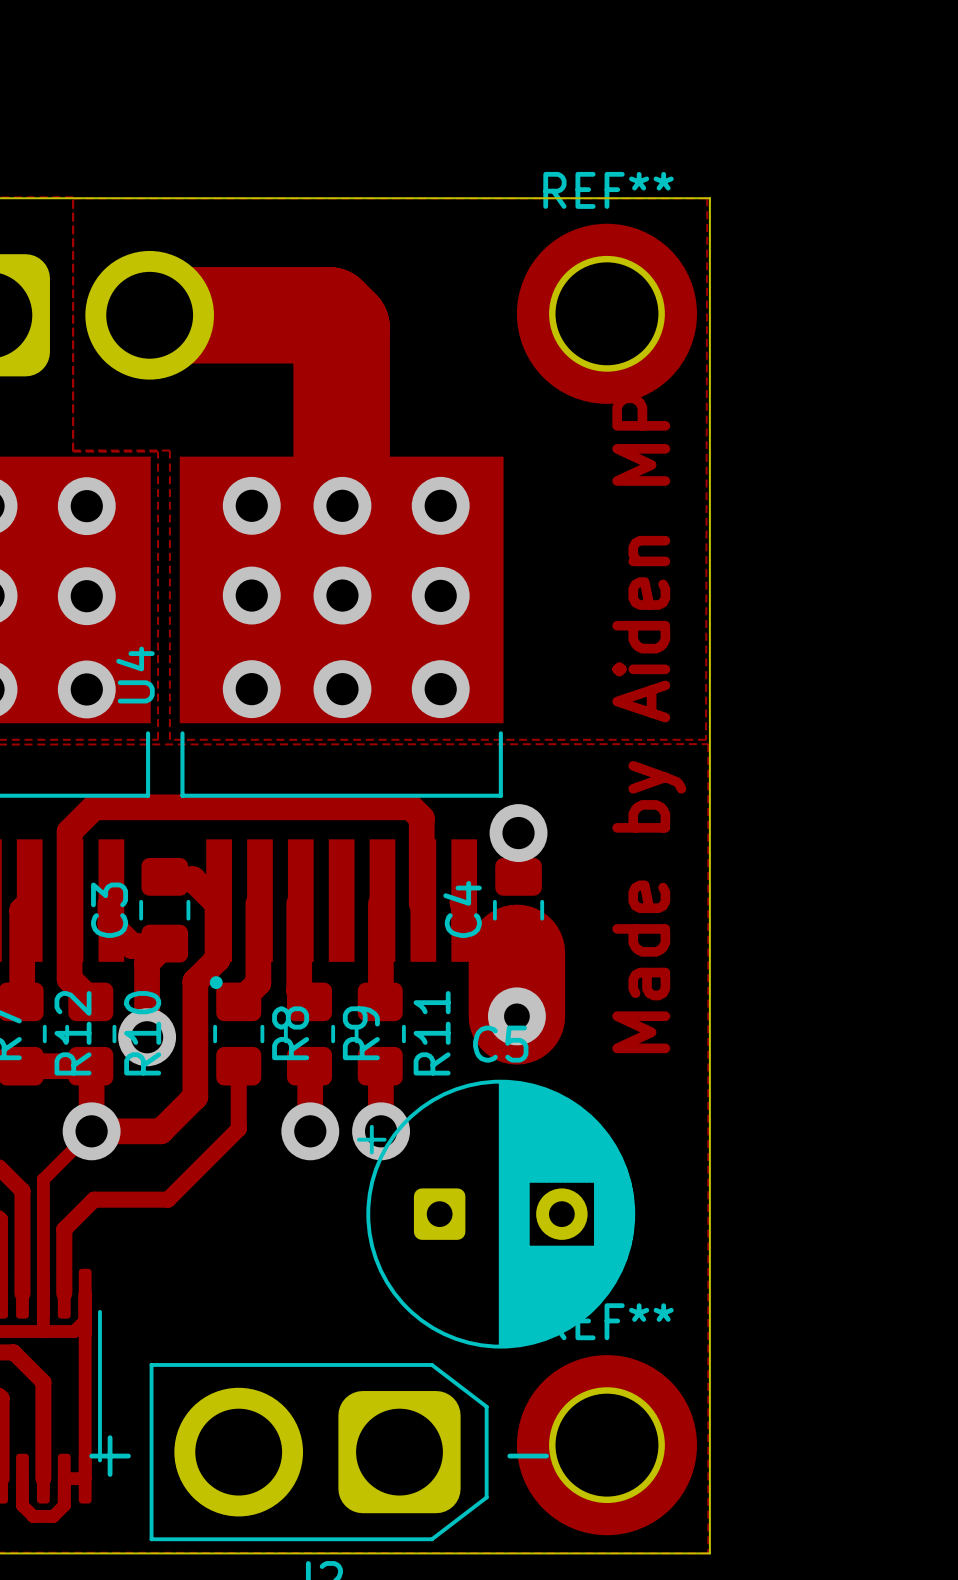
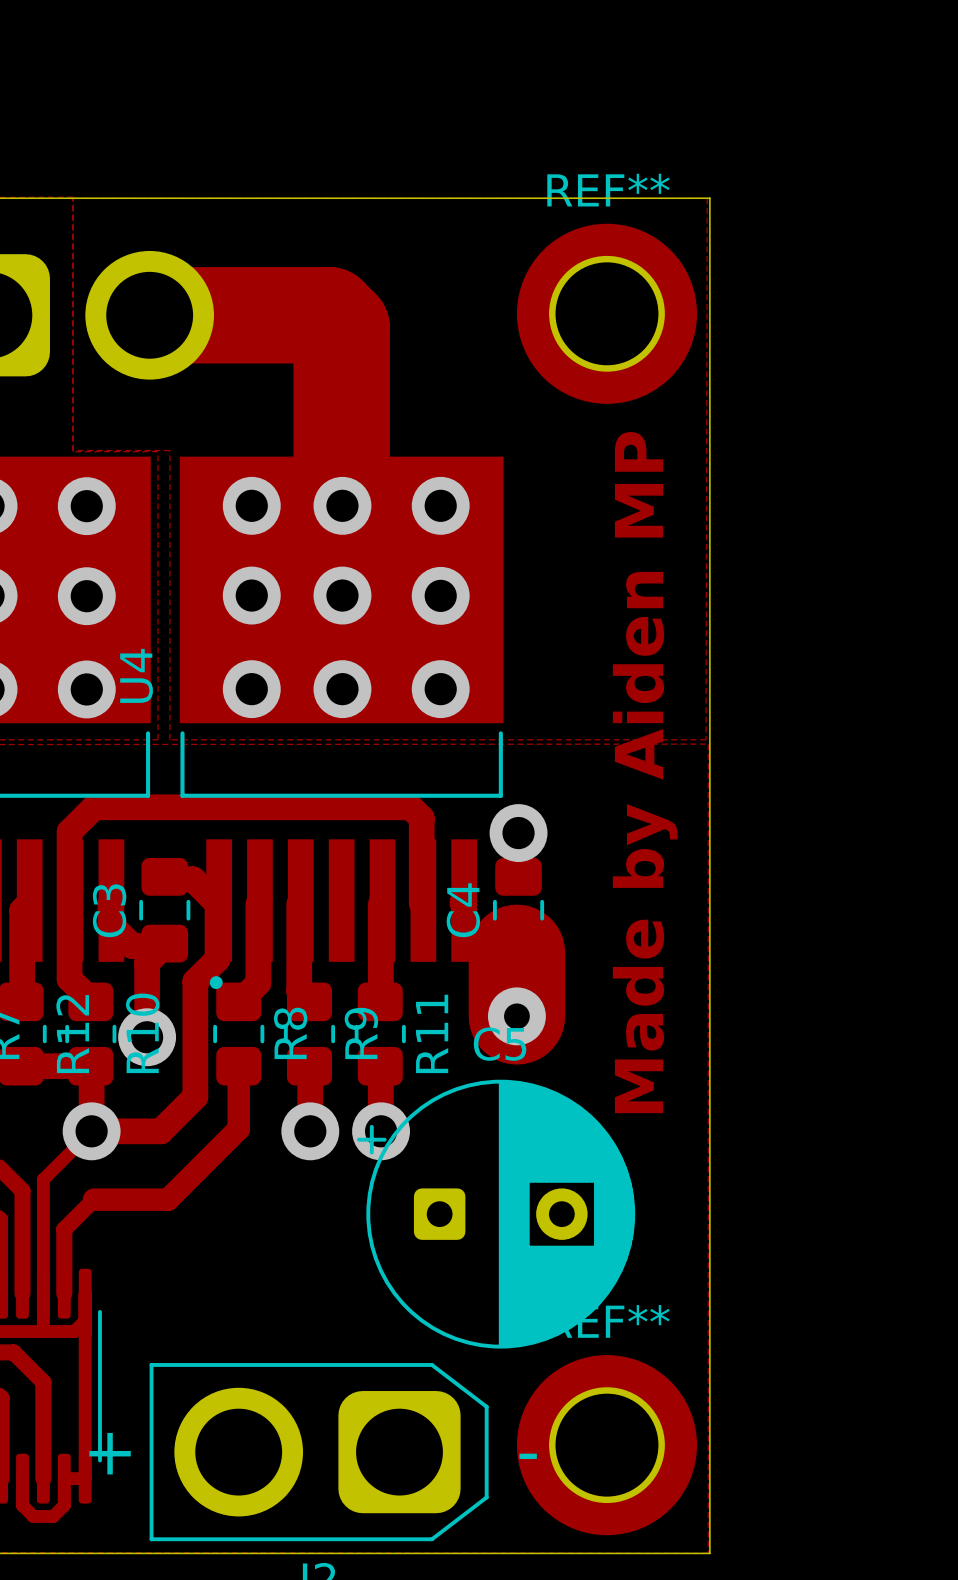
text position: Made by Aiden MP (649, 723) -> Made by Aiden MP (645, 772)
track width: thin (238, 1066) (238, 1128) (168, 1199) (94, 1199) -> thick (238, 1066) (238, 1128) (168, 1199) (94, 1199)

